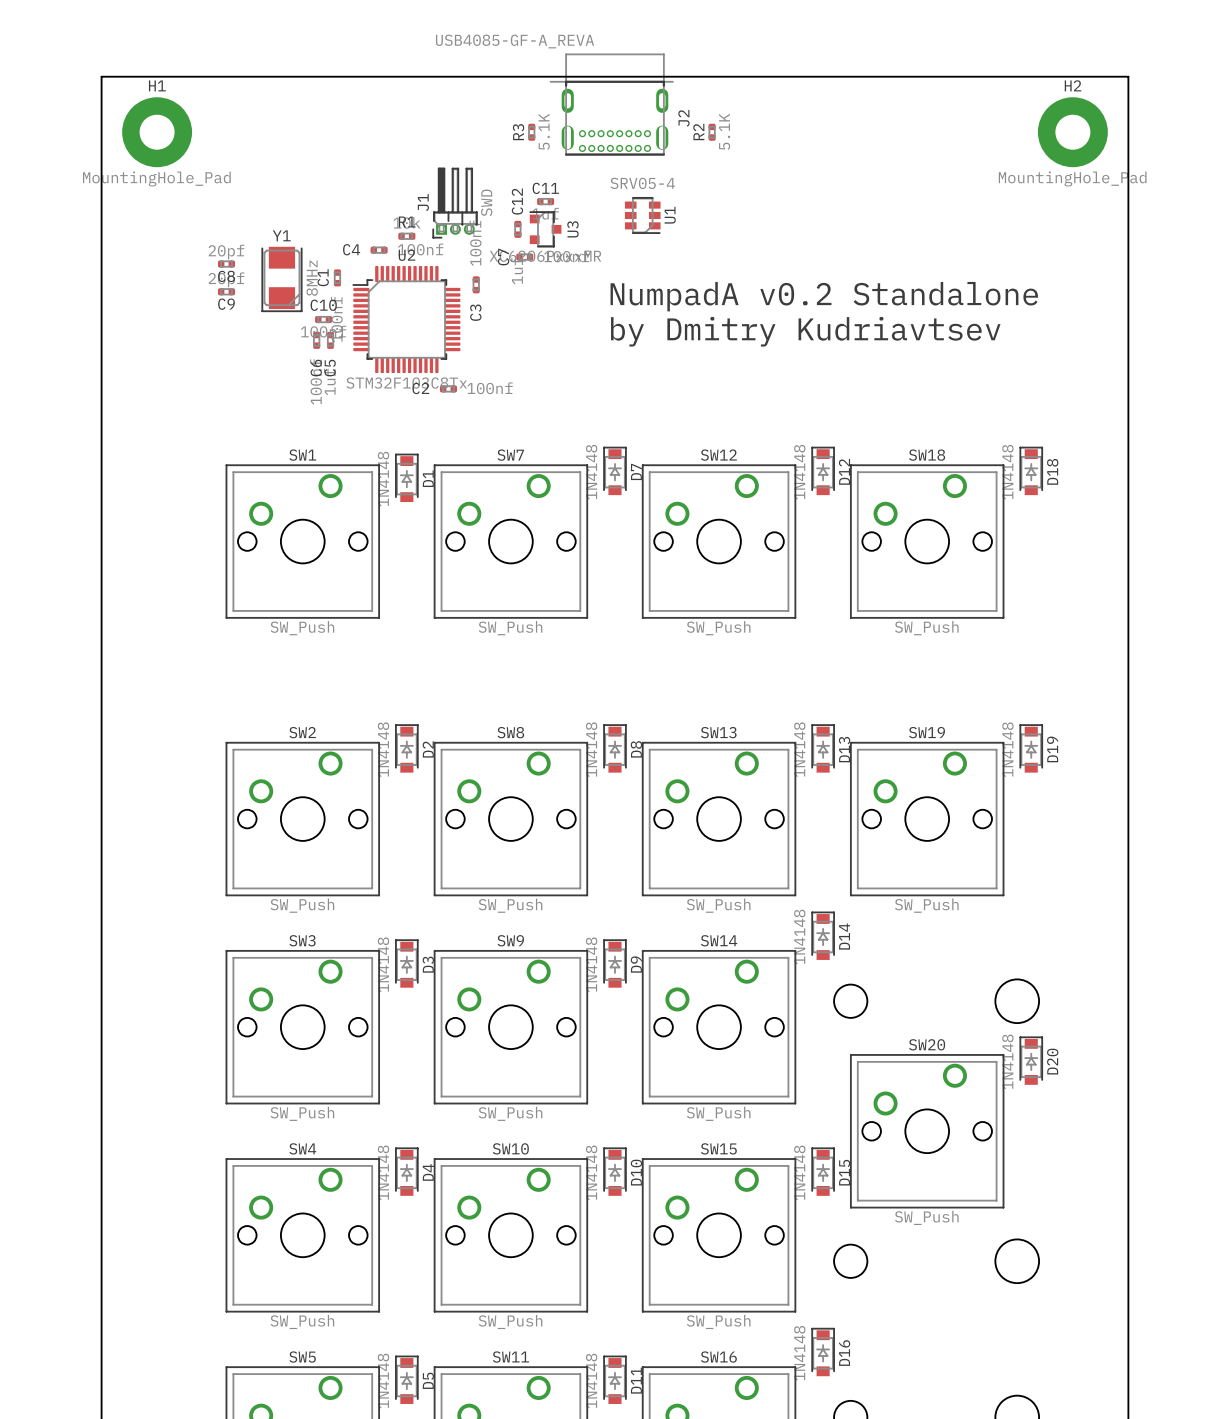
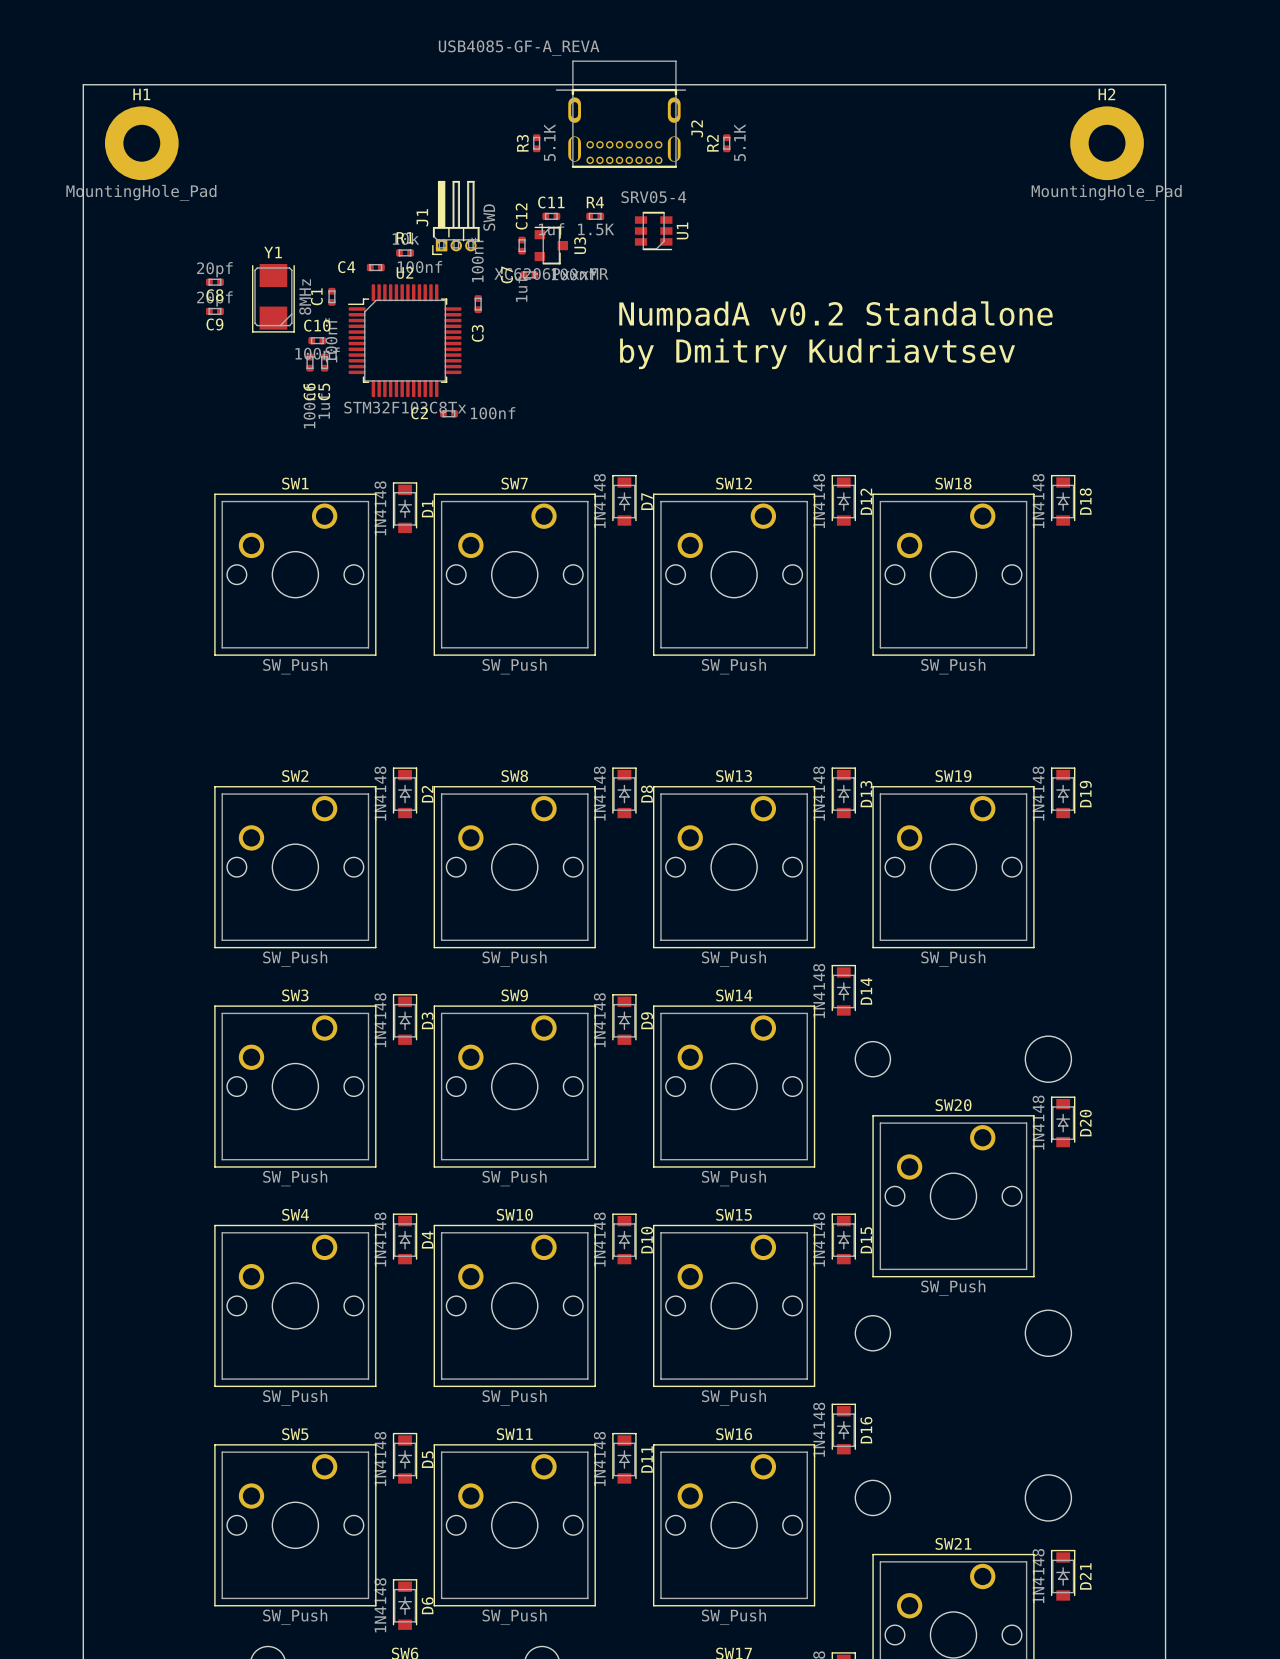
R4: none -> 1.5K (595, 216)

